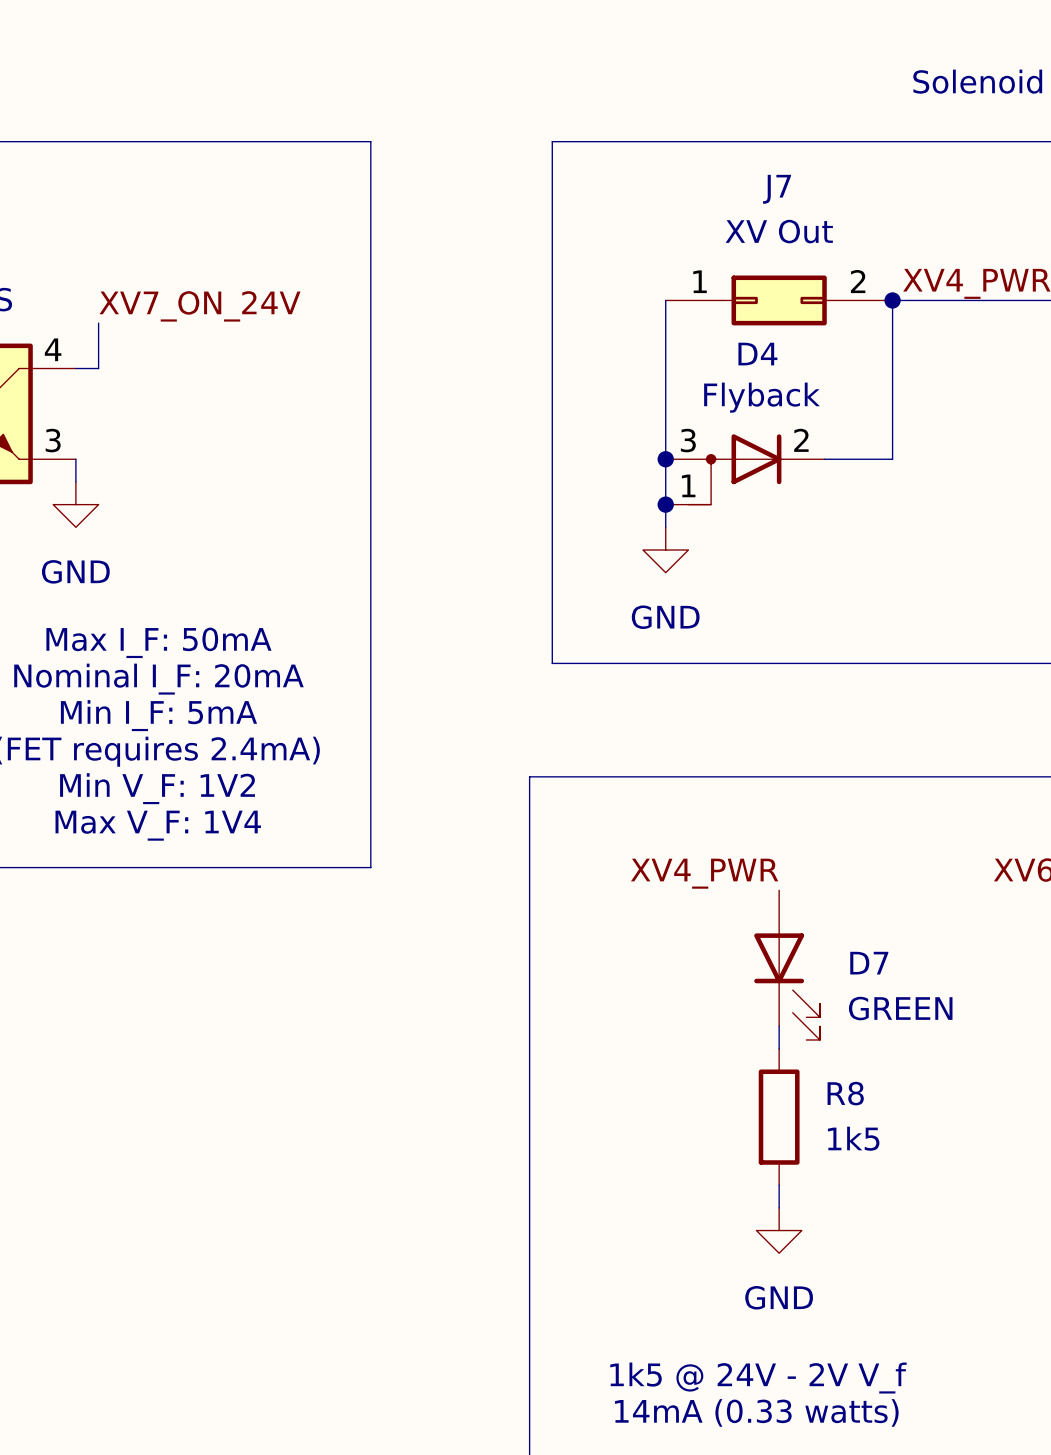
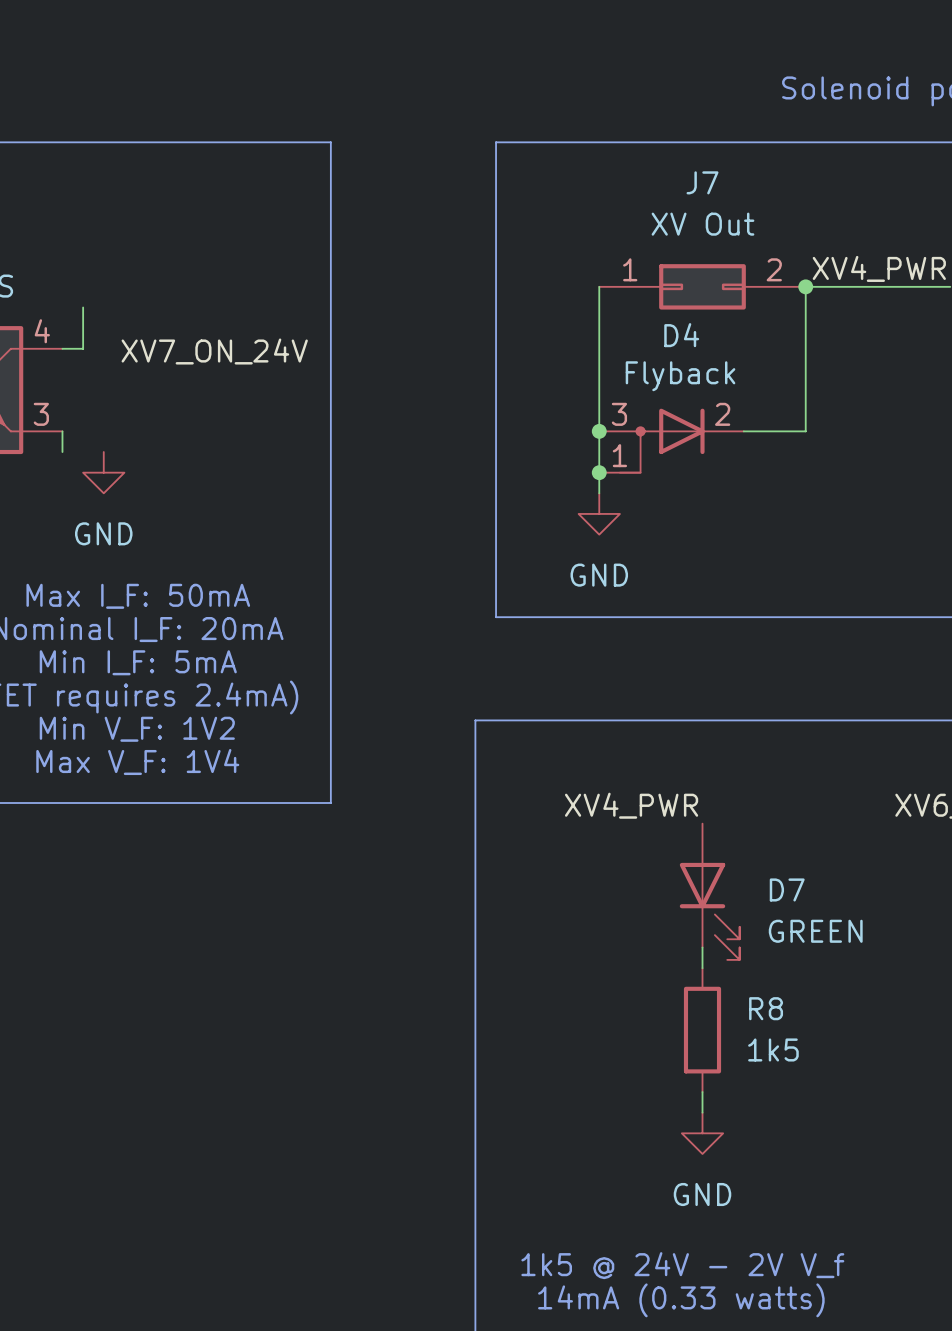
label position: XV7_ON_24V (200, 306) -> XV7_ON_24V (214, 351)
power symbol position: GND (75, 504) -> GND (103, 472)

